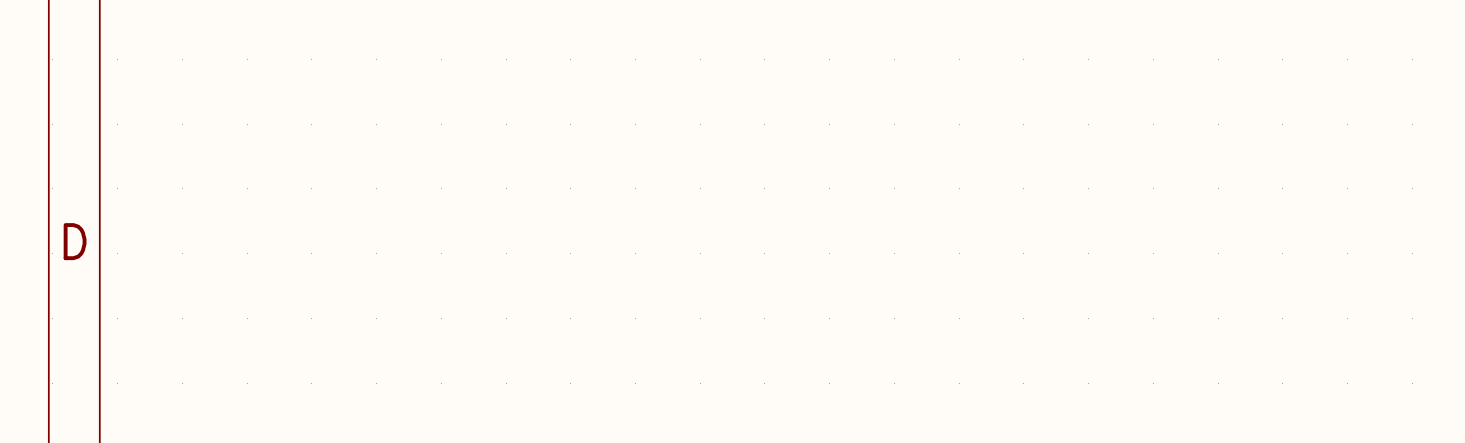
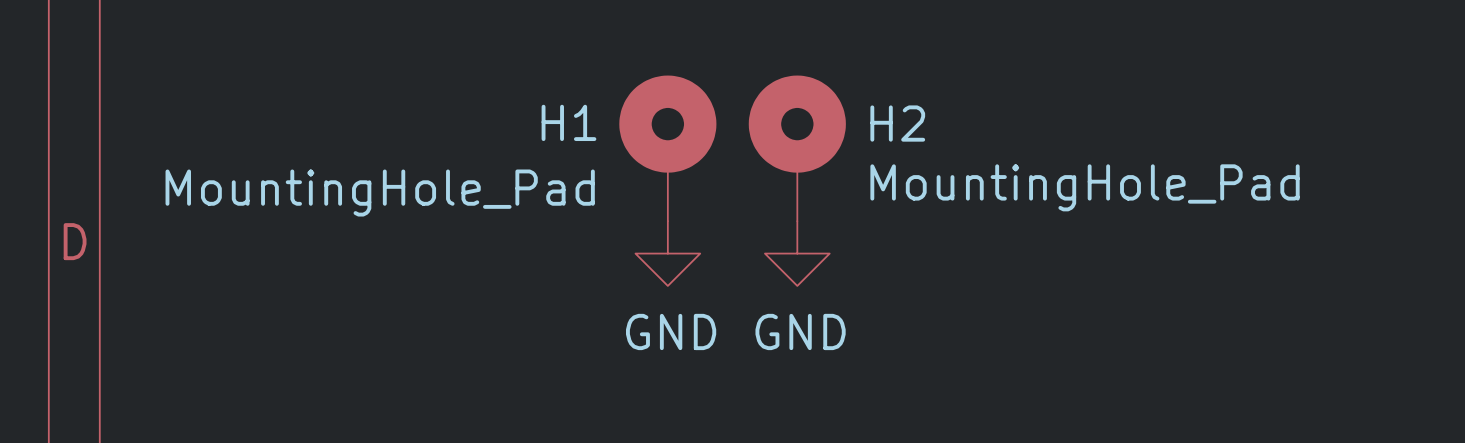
H1: none -> MountingHole_Pad (667, 148)
H2: none -> MountingHole_Pad (797, 148)
power symbol: none -> GND (667, 253)
power symbol: none -> GND (797, 253)

